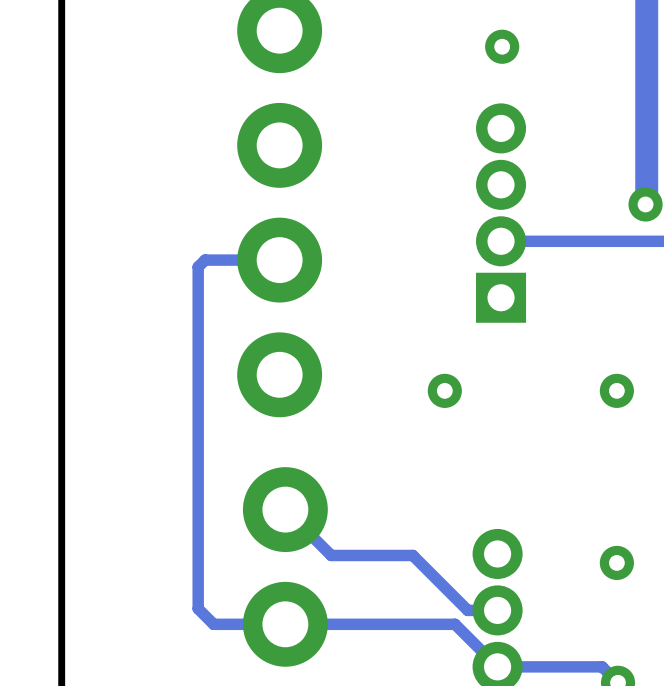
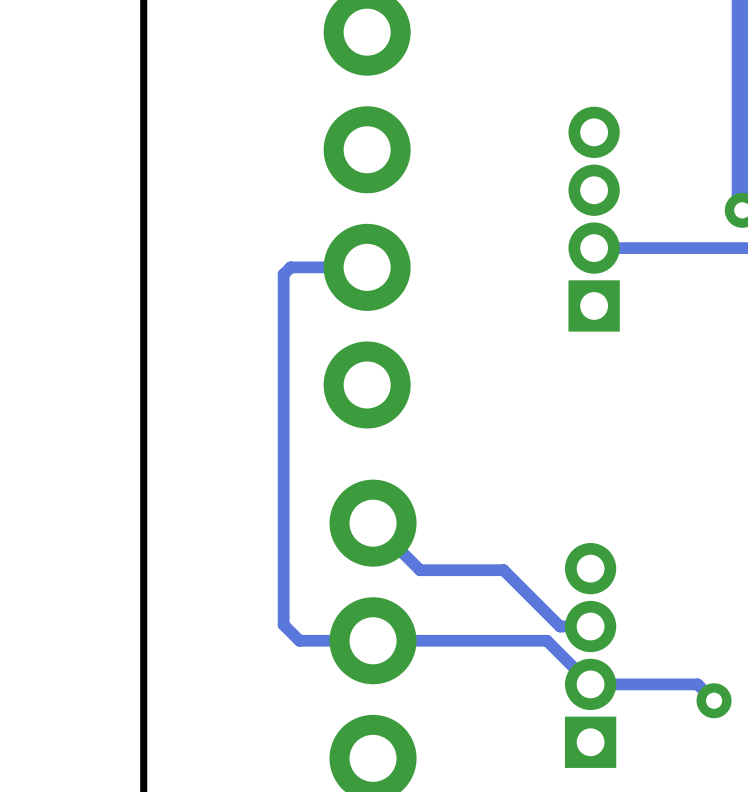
via: (502, 46) -> none
via: (444, 390) -> none
via: (616, 390) -> none
via: (616, 562) -> none

